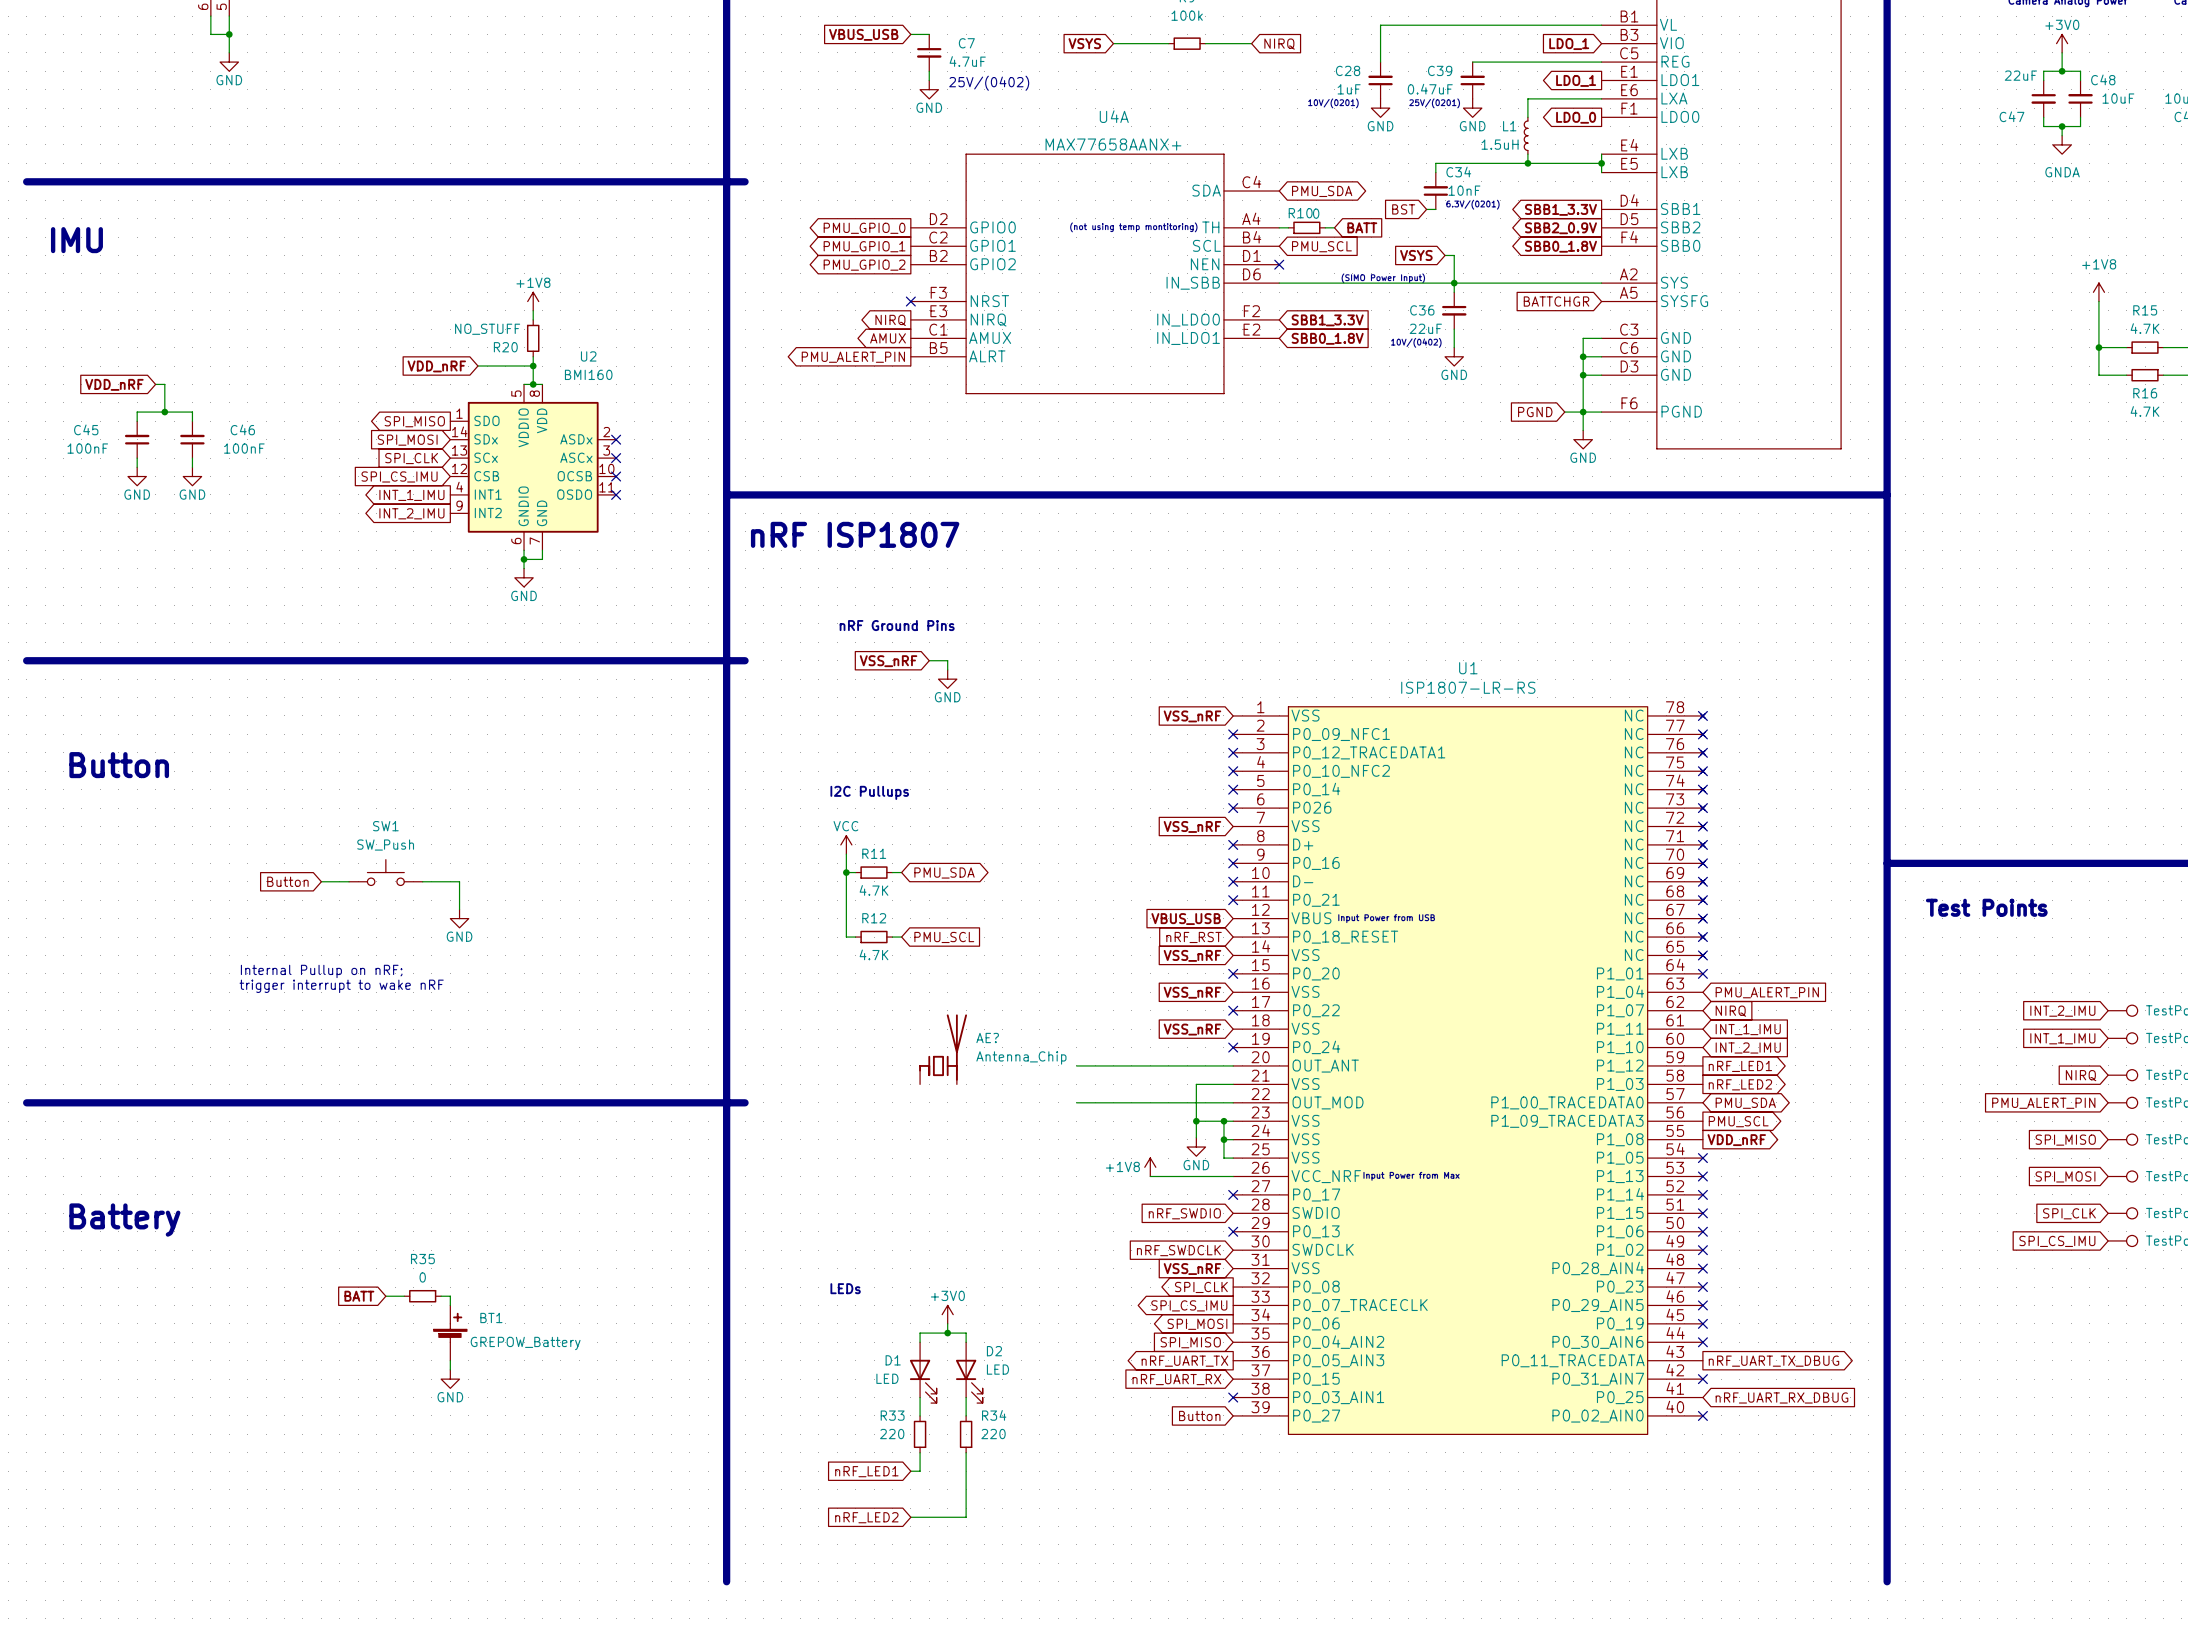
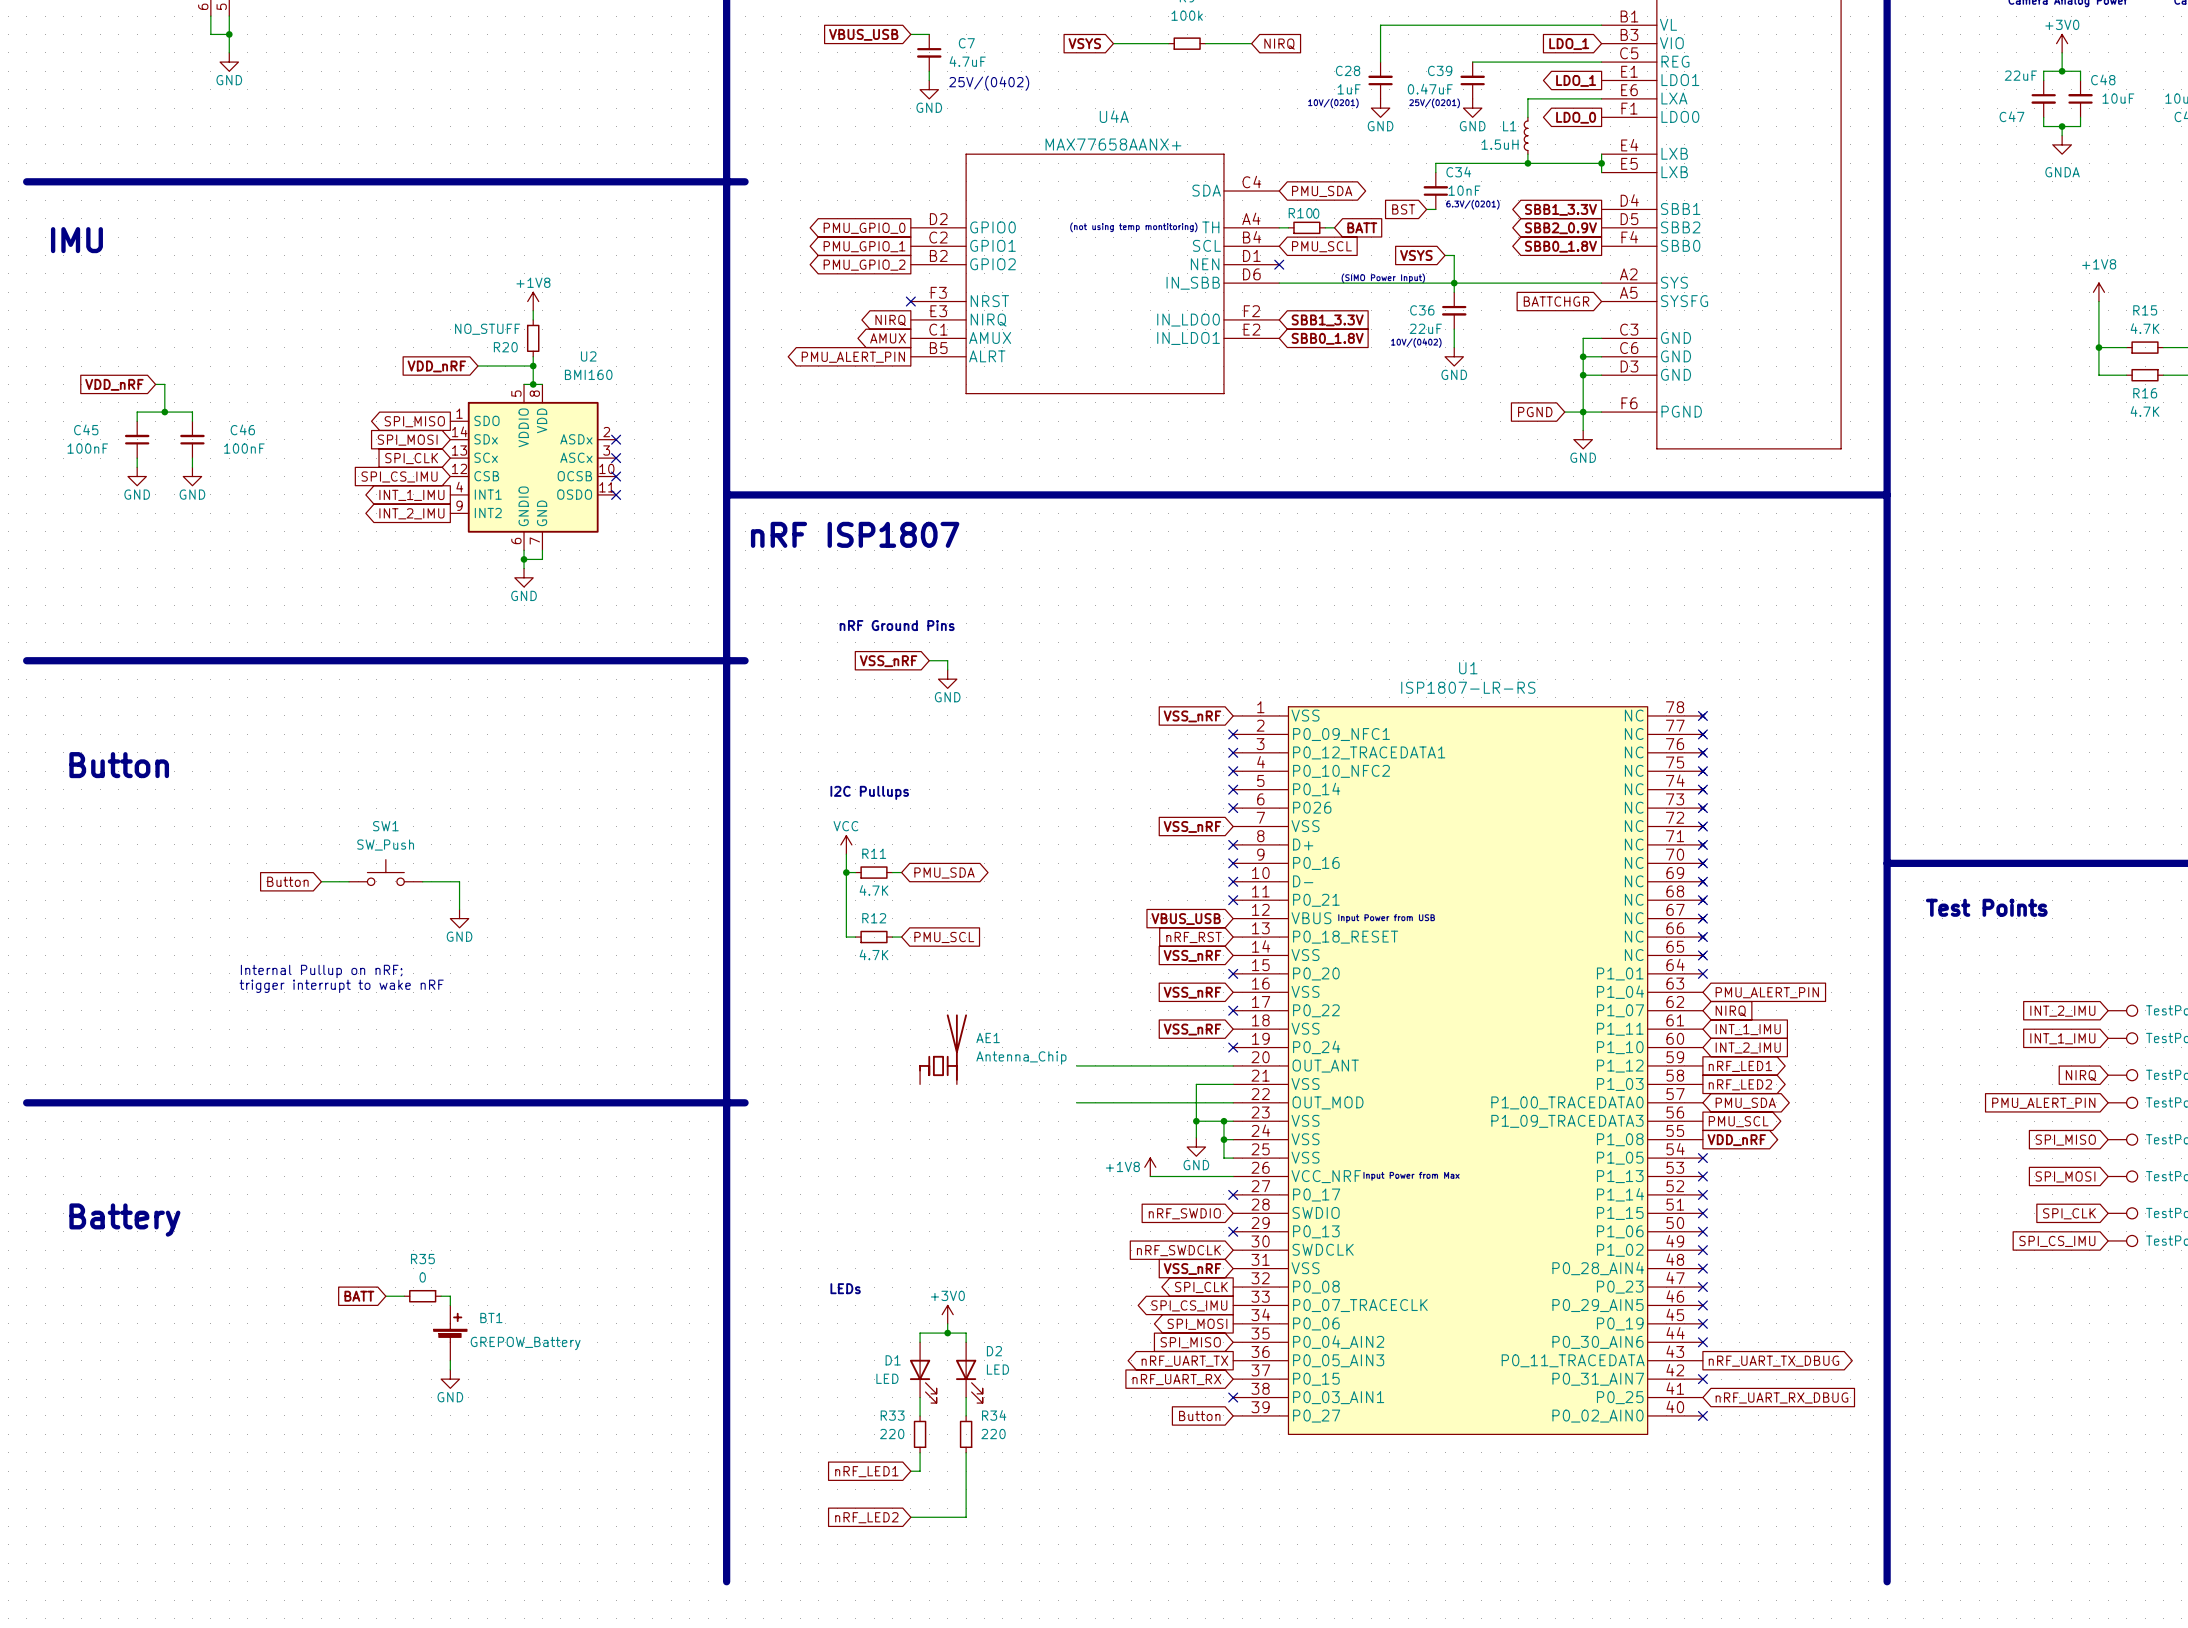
AE? name: AE? (987, 1038) -> AE1 (988, 1038)

